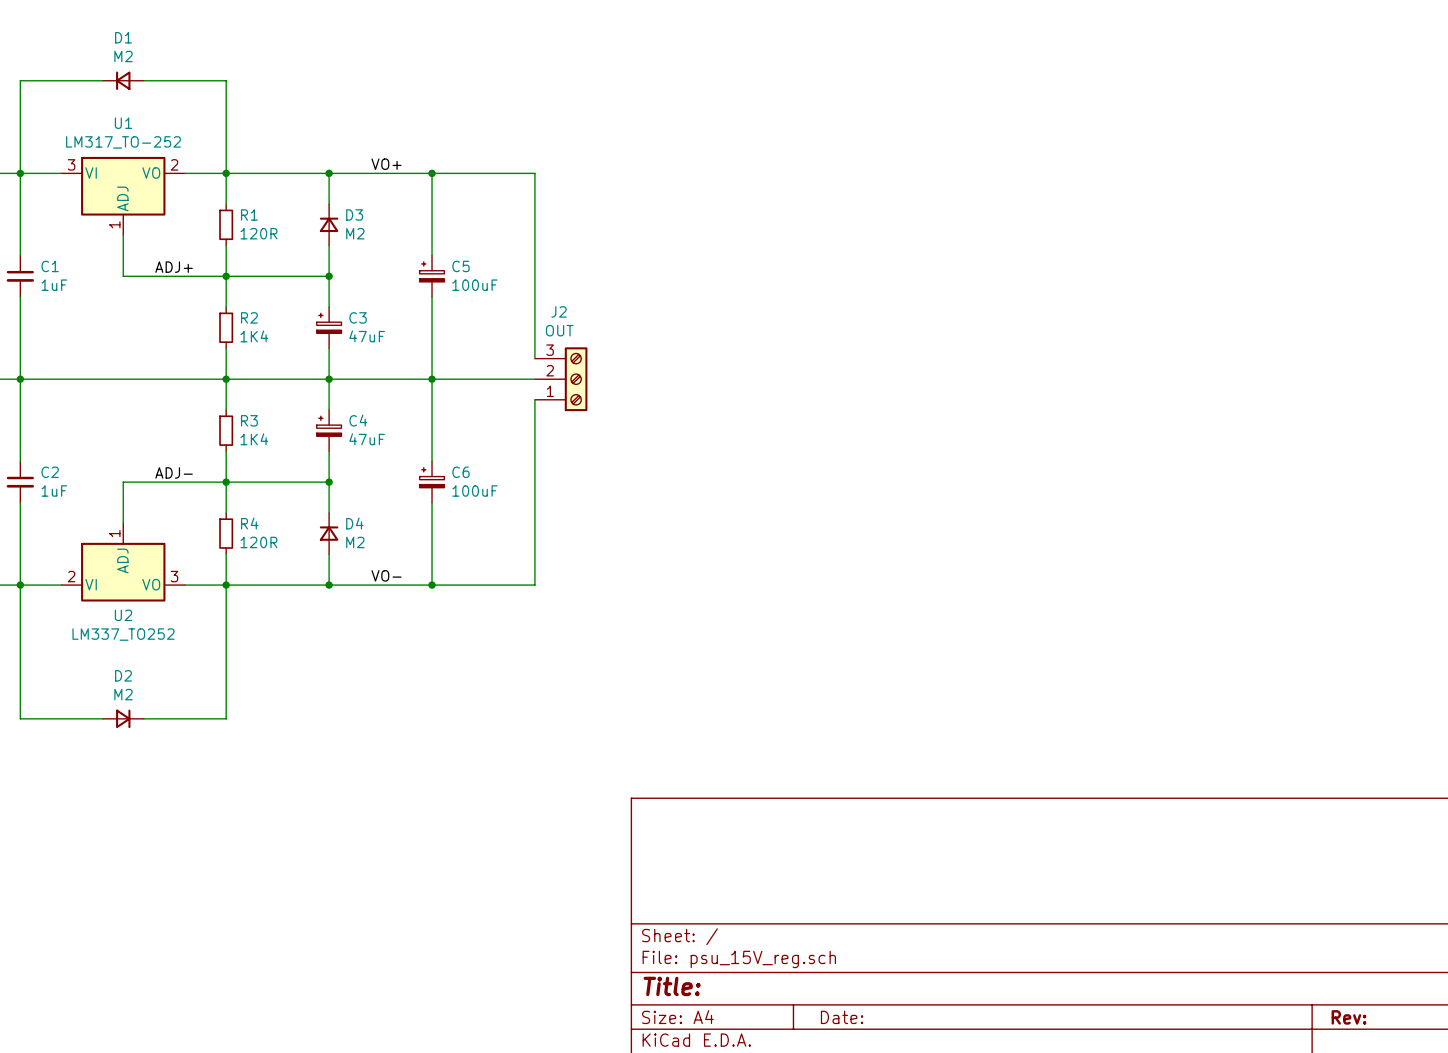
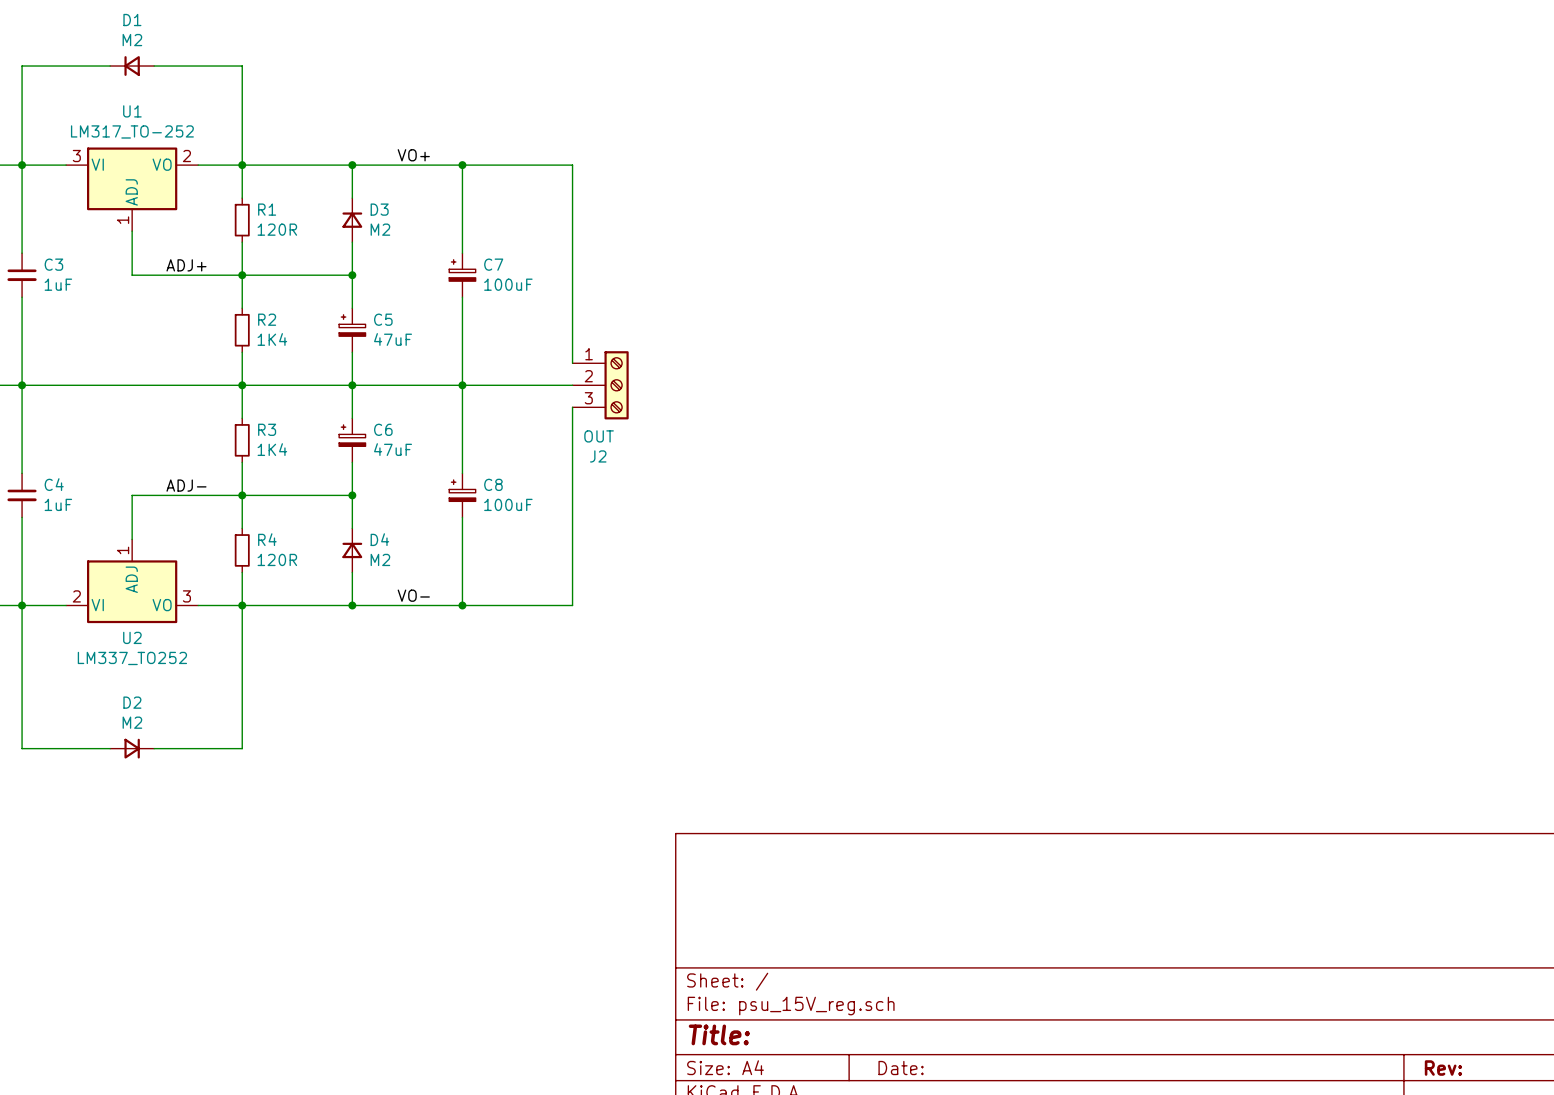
C1 name: C1 (50, 266) -> C3 (53, 264)
C5 name: C5 (460, 266) -> C7 (493, 264)
C3 name: C3 (358, 317) -> C5 (383, 319)
J2 flip: as is (576, 379) -> up-down (616, 385)
C4 name: C4 (358, 420) -> C6 (383, 429)
C2 name: C2 (50, 472) -> C4 (54, 484)
C6 name: C6 (460, 472) -> C8 (493, 484)

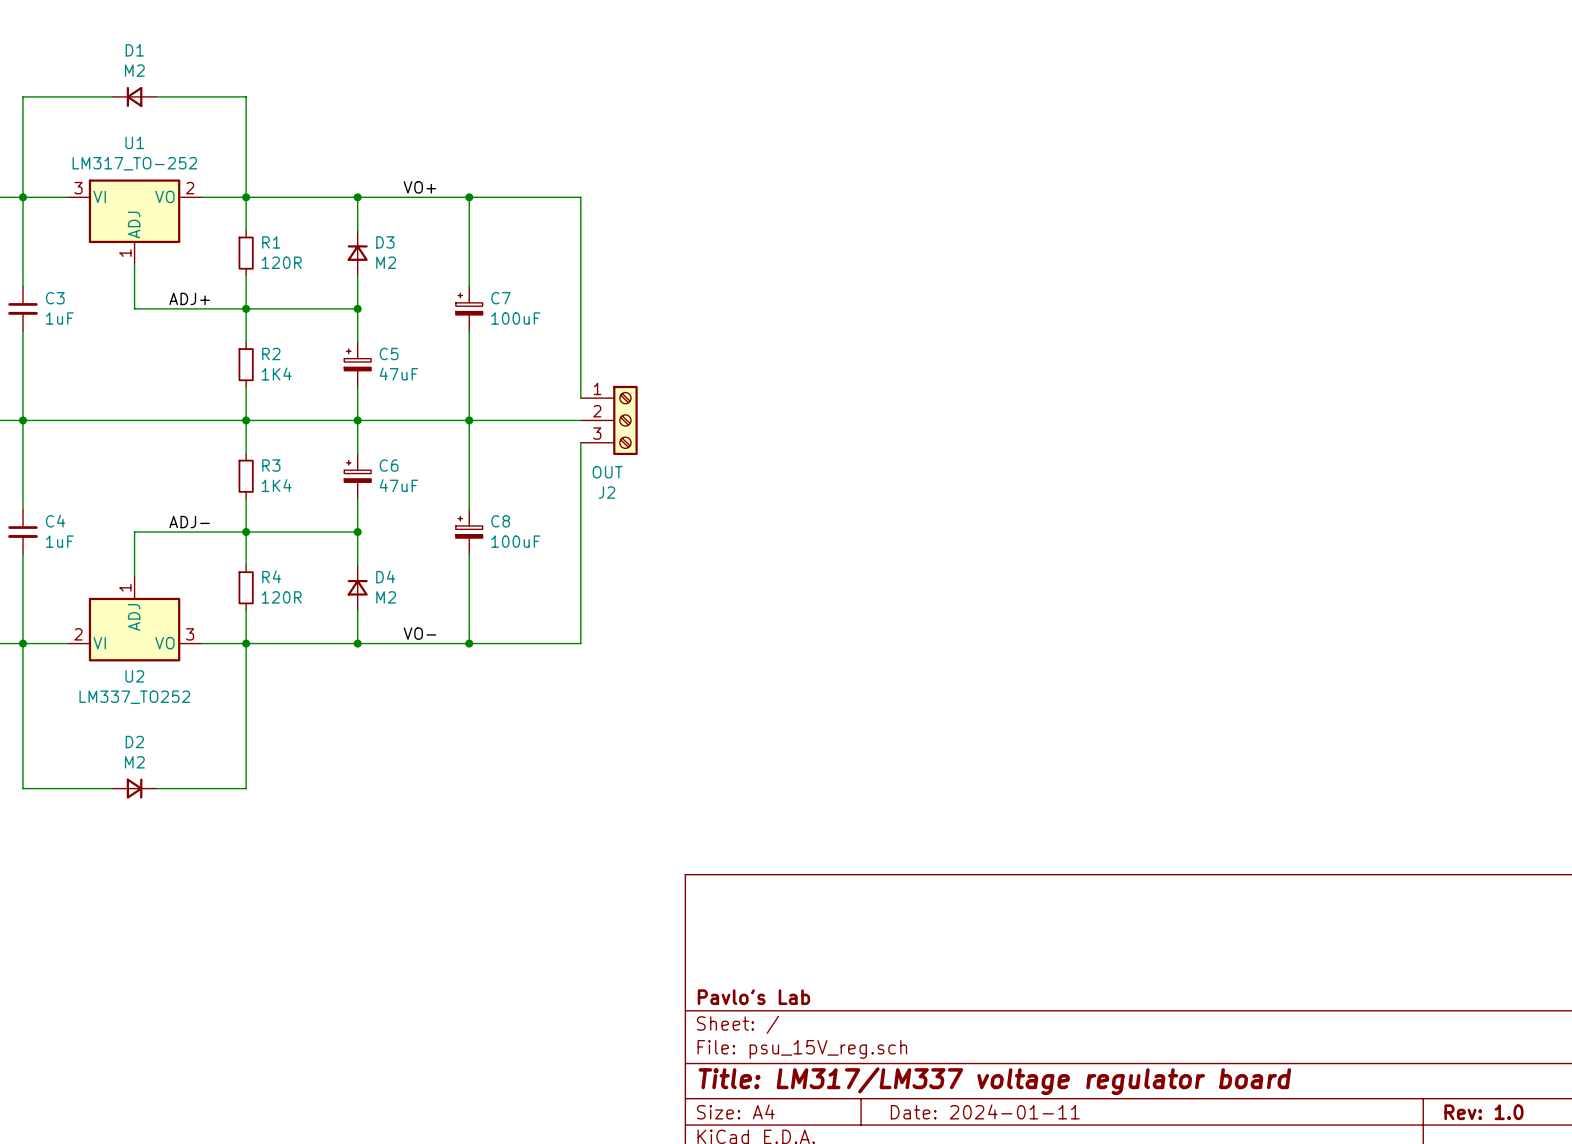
title block: none -> Pavlo's Lab (753, 997)
title block: Title: (719, 1034) -> Title: LM317/LM337 voltage regulator board (994, 1081)
title block: Date: (901, 1068) -> Date: 2024-01-11 (985, 1111)
title block: Rev: (1443, 1068) -> Rev: 1.0 (1483, 1112)

